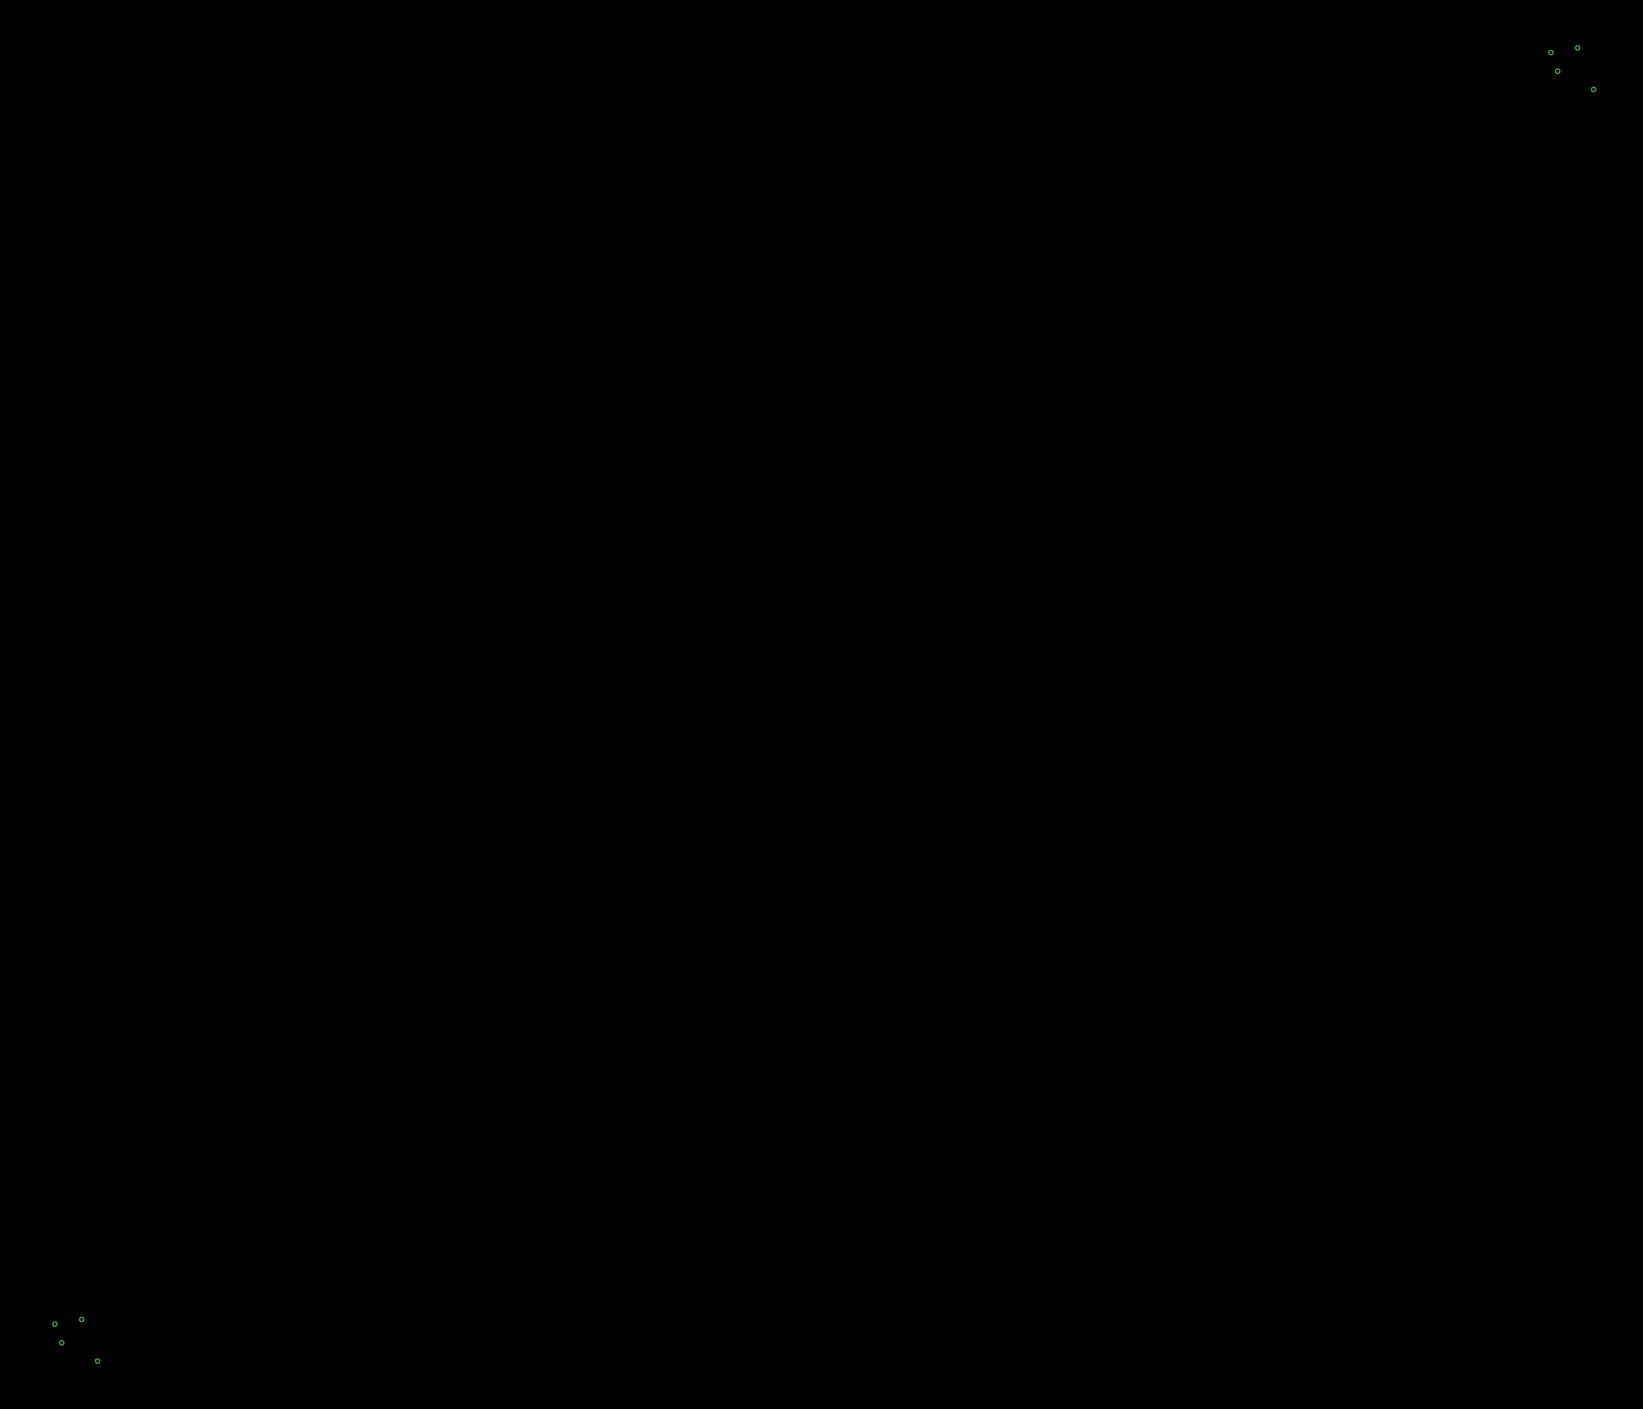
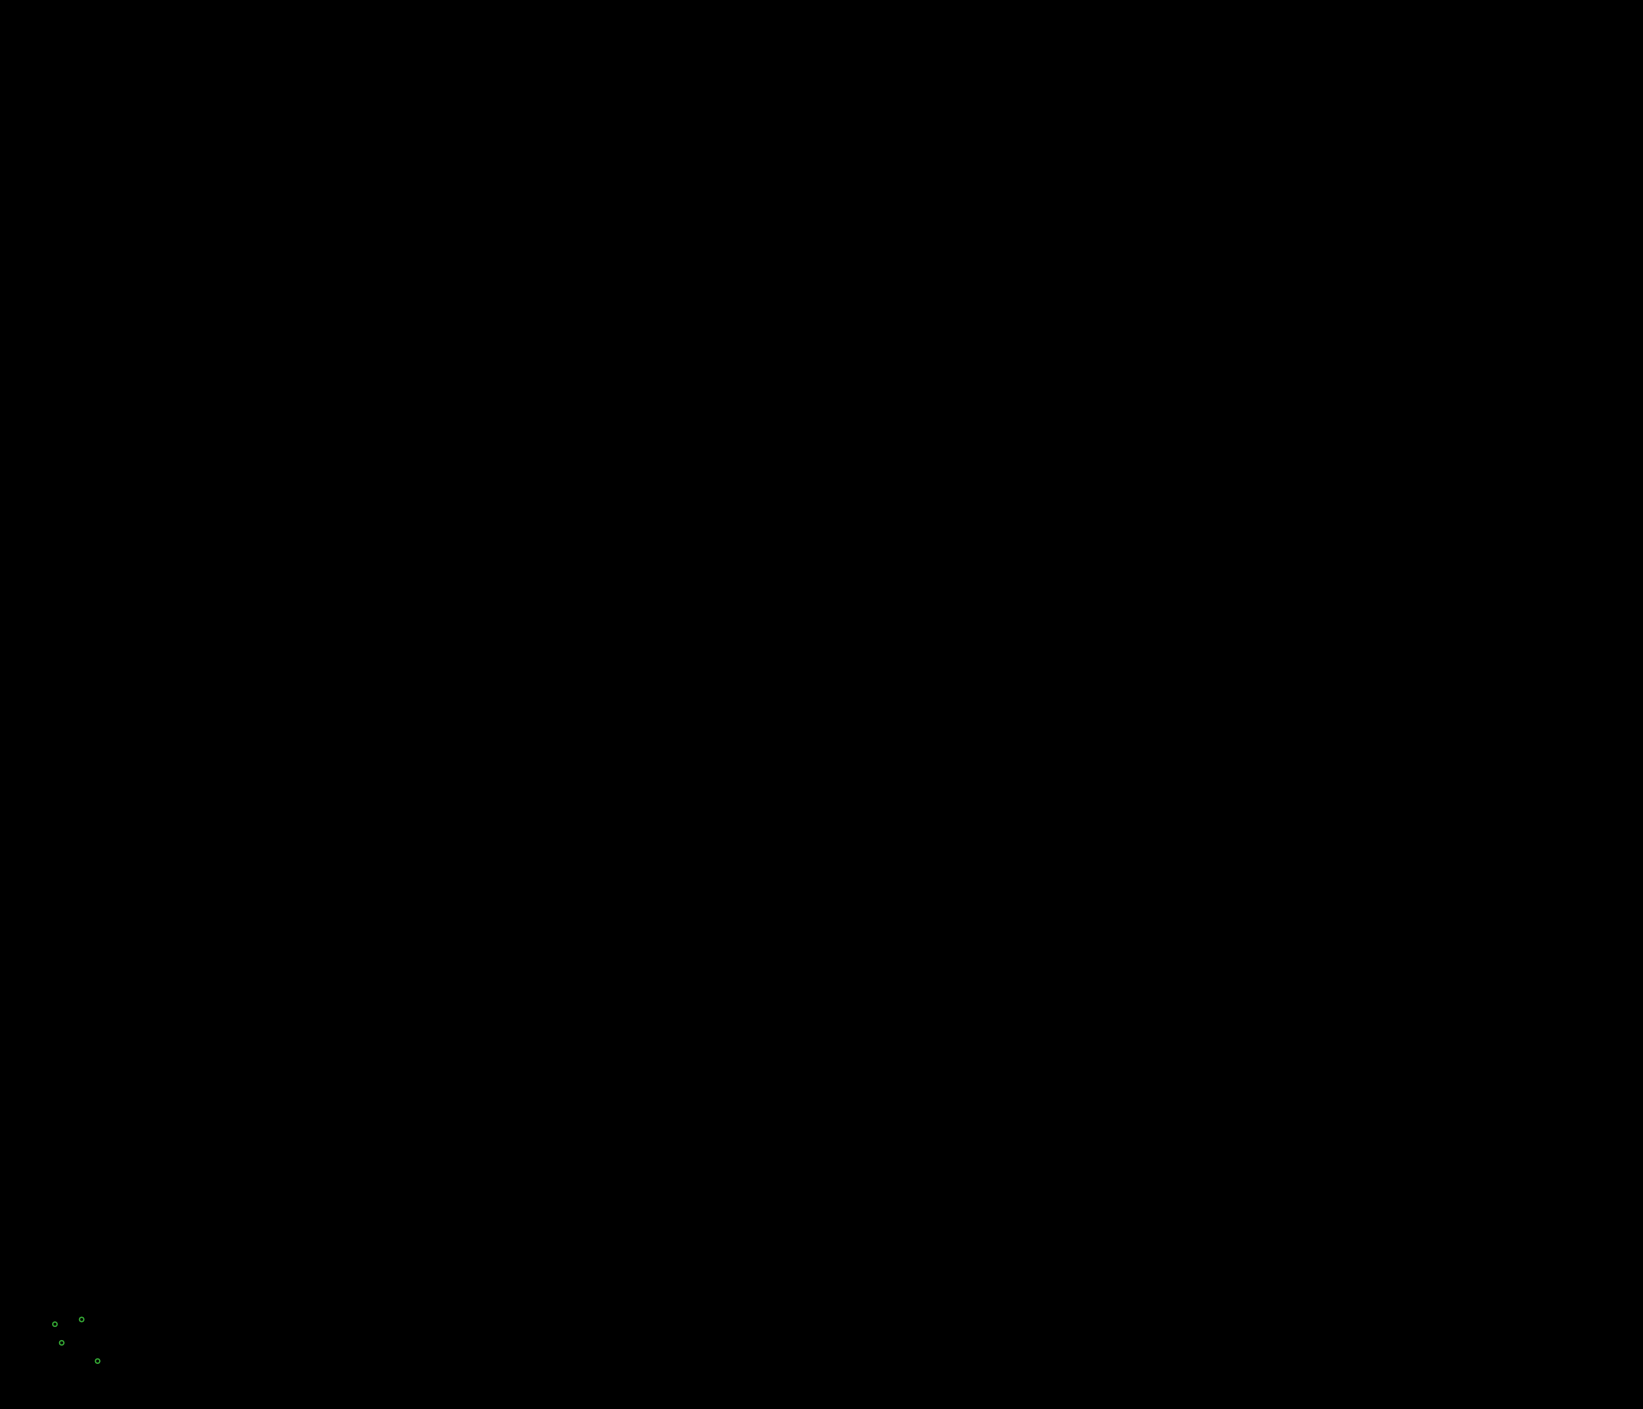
via: (1577, 47) -> none
via: (1550, 52) -> none
via: (1557, 71) -> none
via: (1593, 89) -> none

